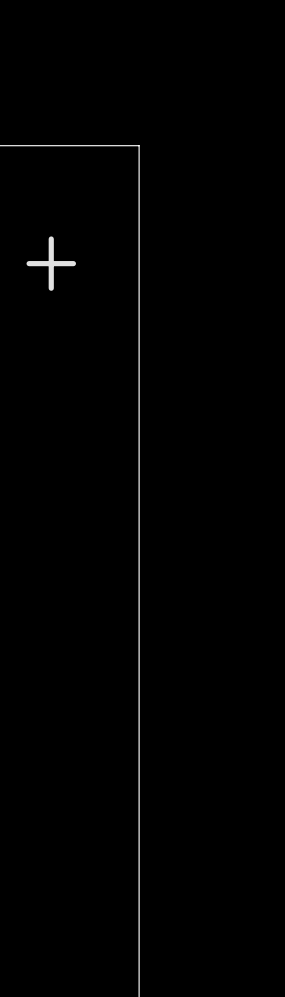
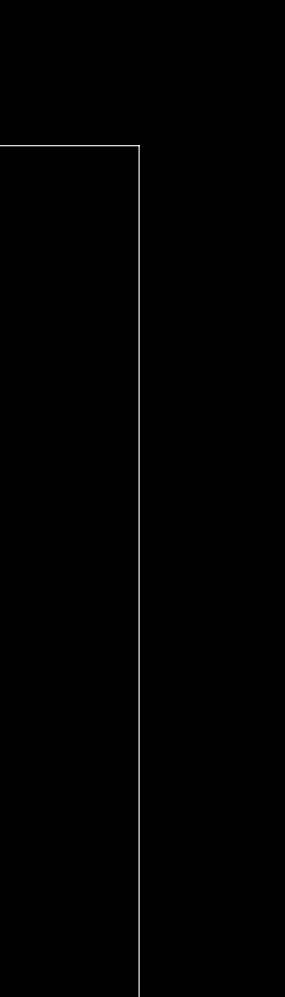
text: + (51, 263) -> none

